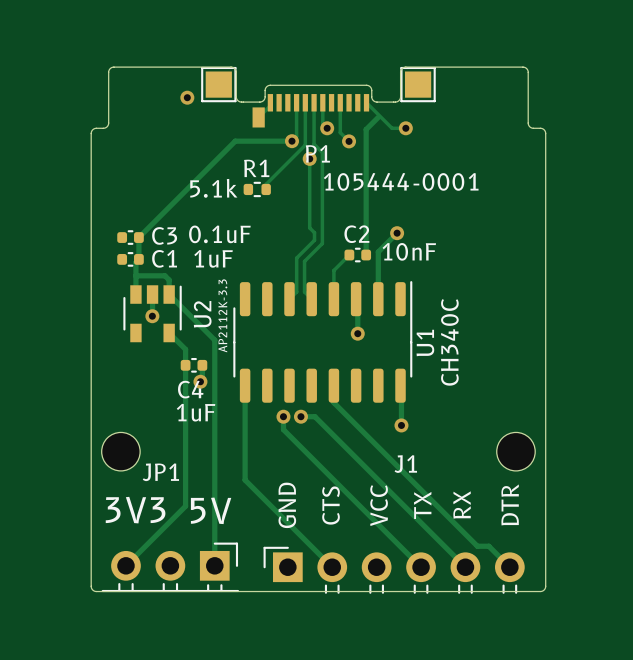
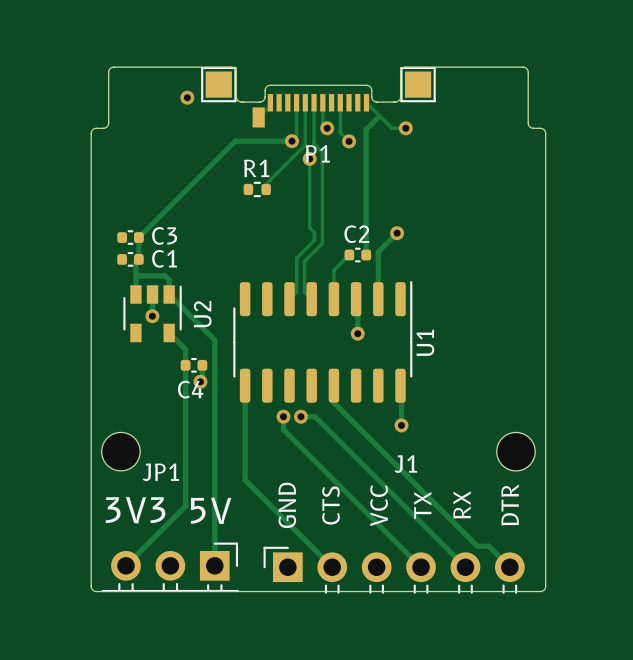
P1 value: 105444-0001 (401, 181) -> none
R1 value: 5.1k (213, 188) -> none
C1 value: 0.1uF (219, 234) -> none
C2 value: 10nF (409, 251) -> none
C3 value: 1uF (213, 258) -> none
U2 value: AP2112K-3.3 (222, 315) -> none
U1 value: CH340C (449, 342) -> none
C4 value: 1uF (196, 412) -> none

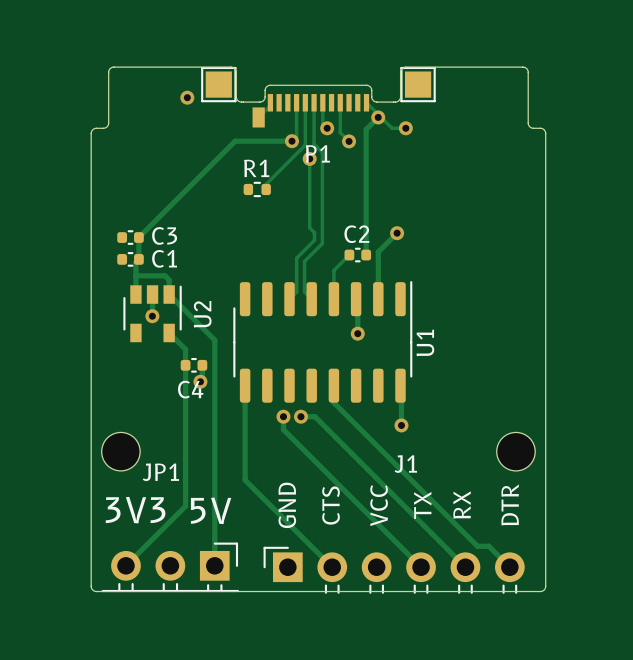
via: none -> (378, 117)

